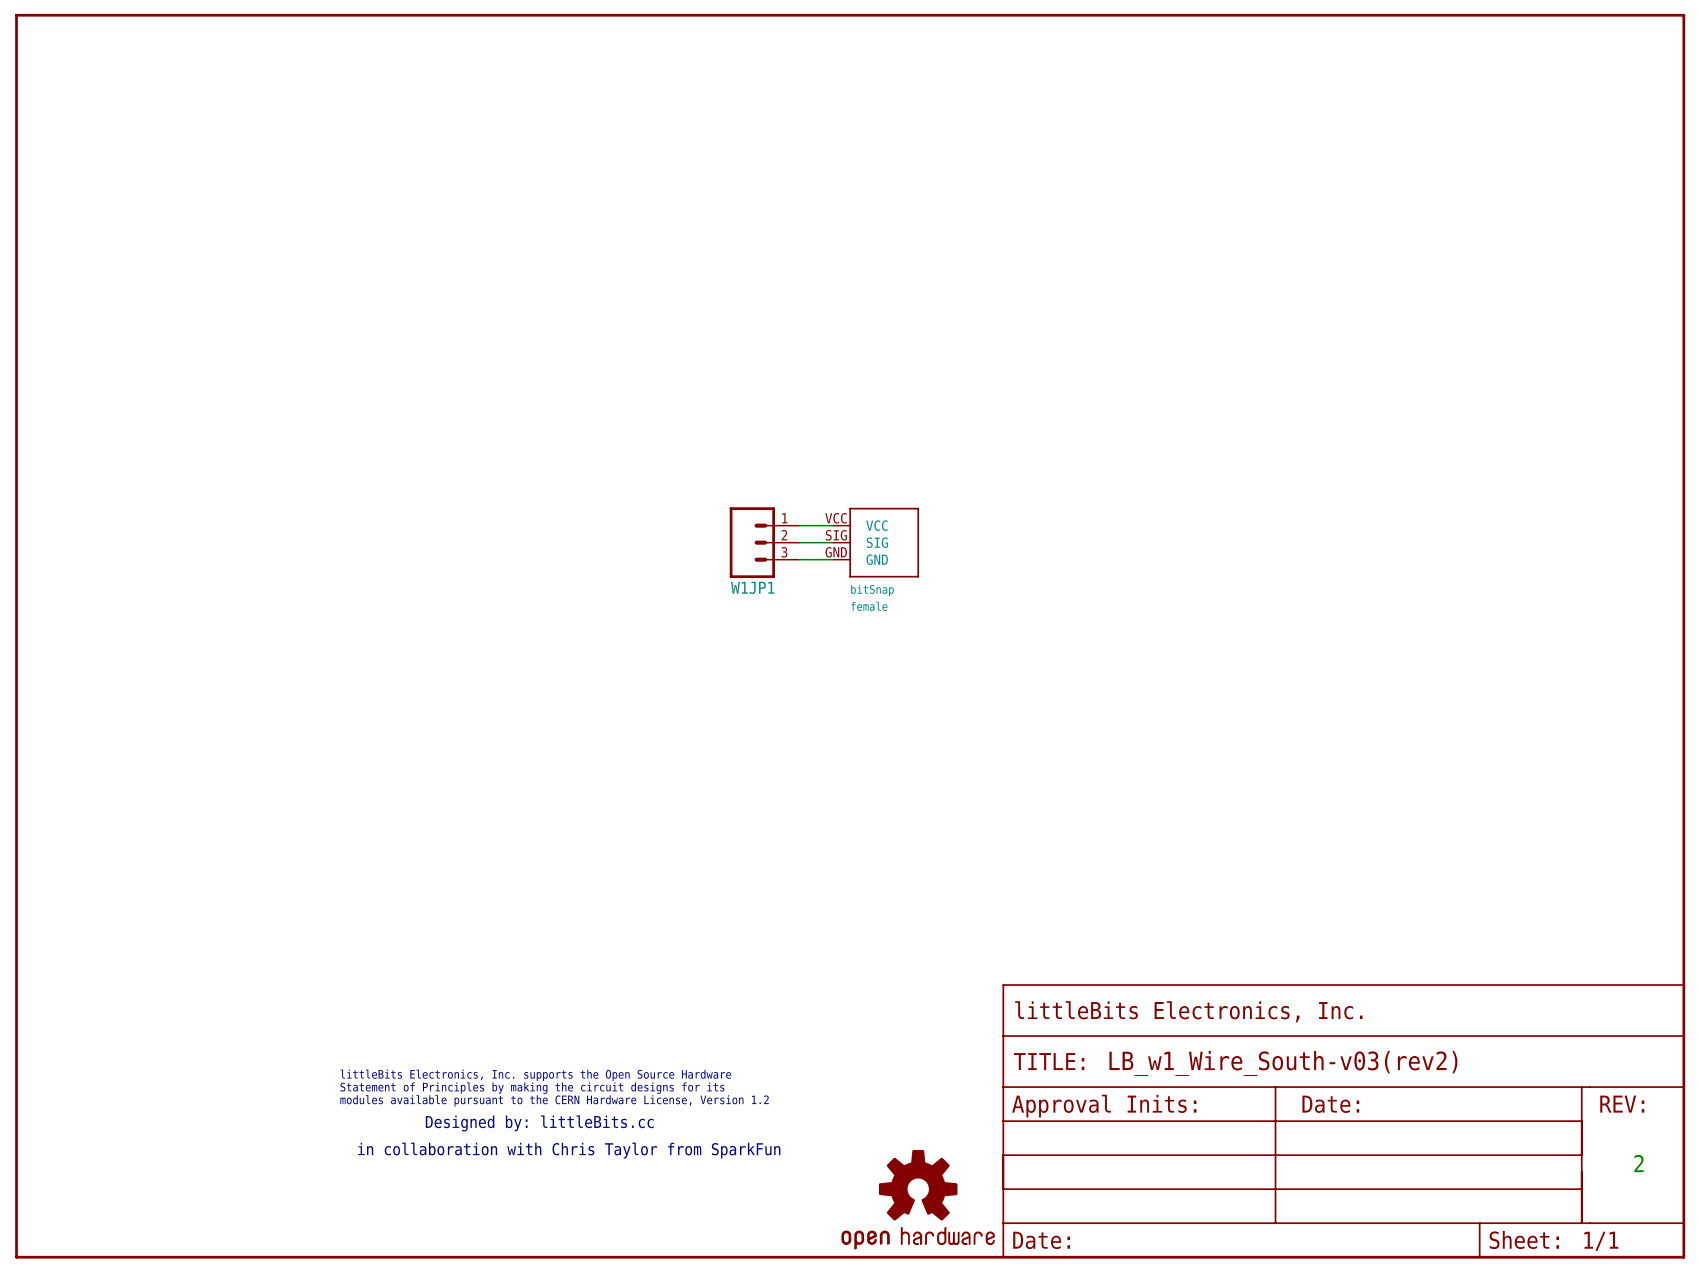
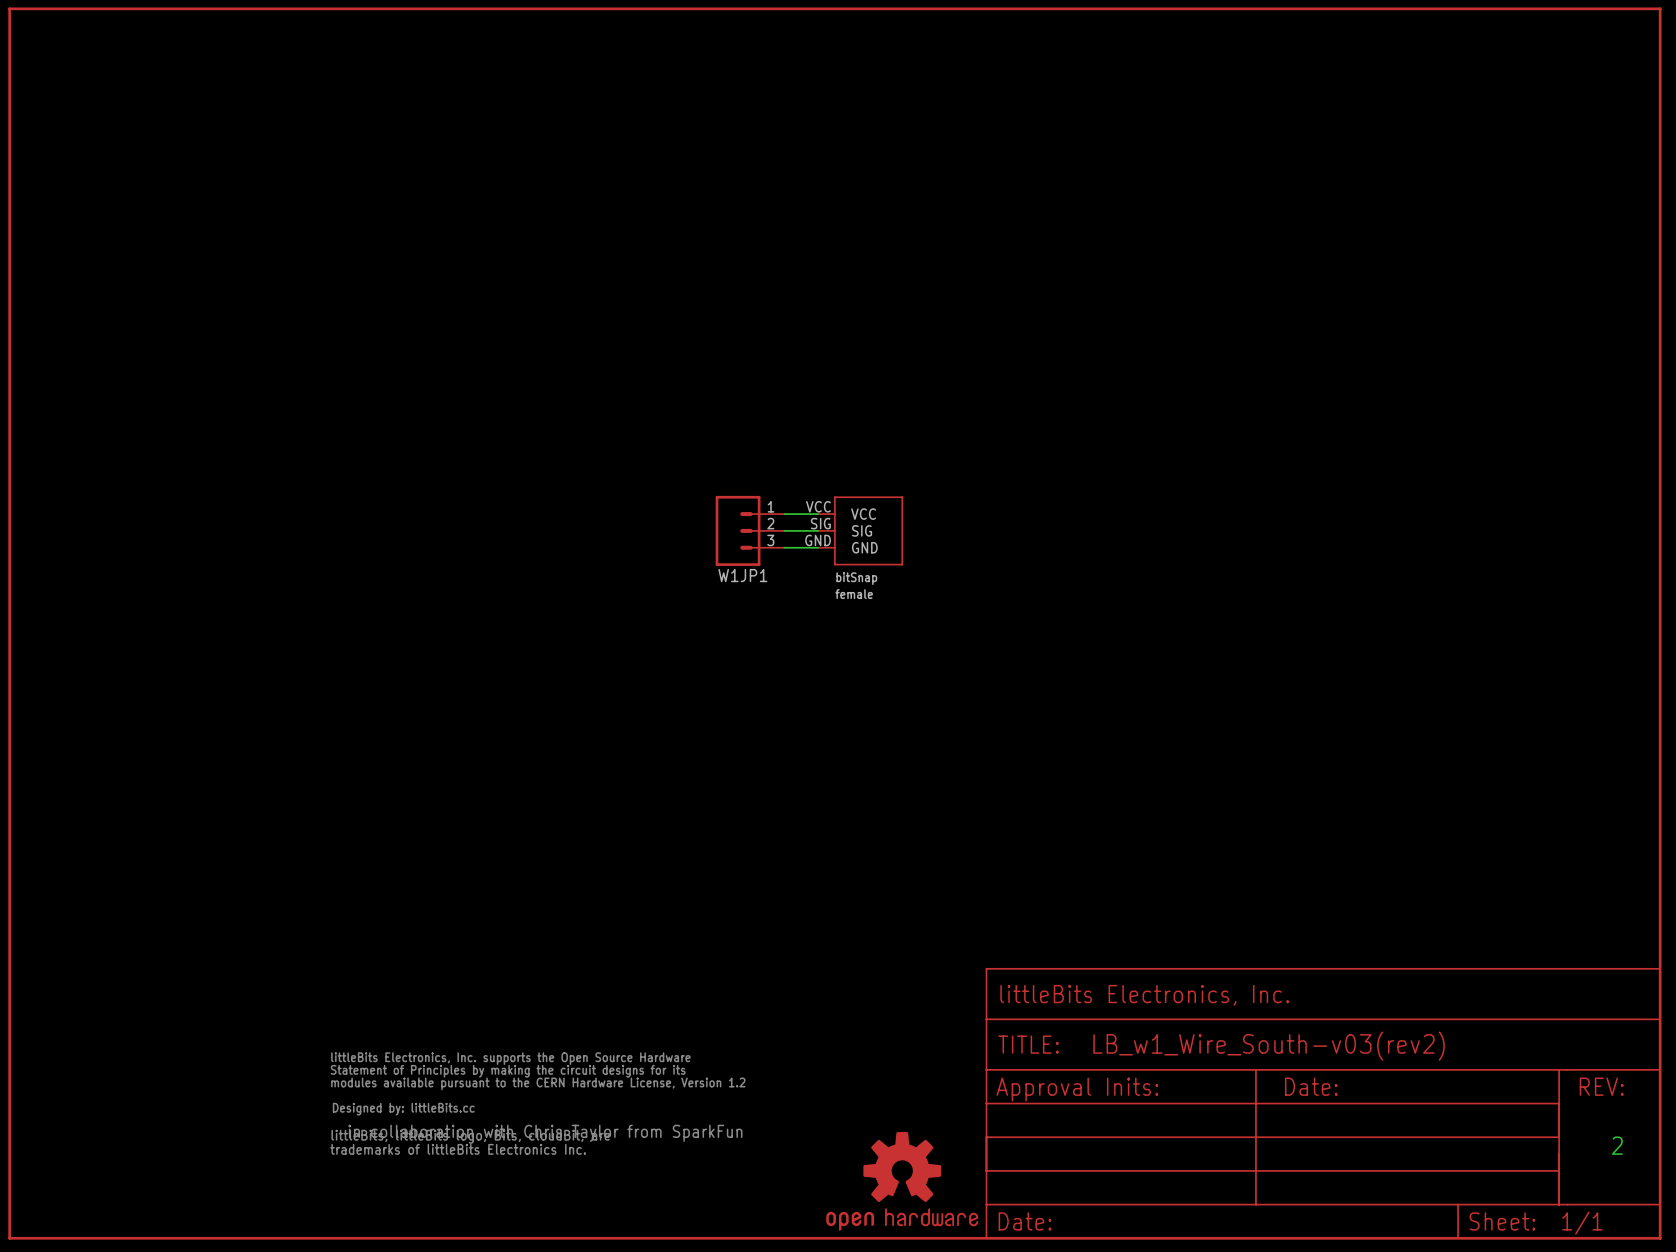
part: (554, 1100) -> none
part: none -> (537, 1103)

